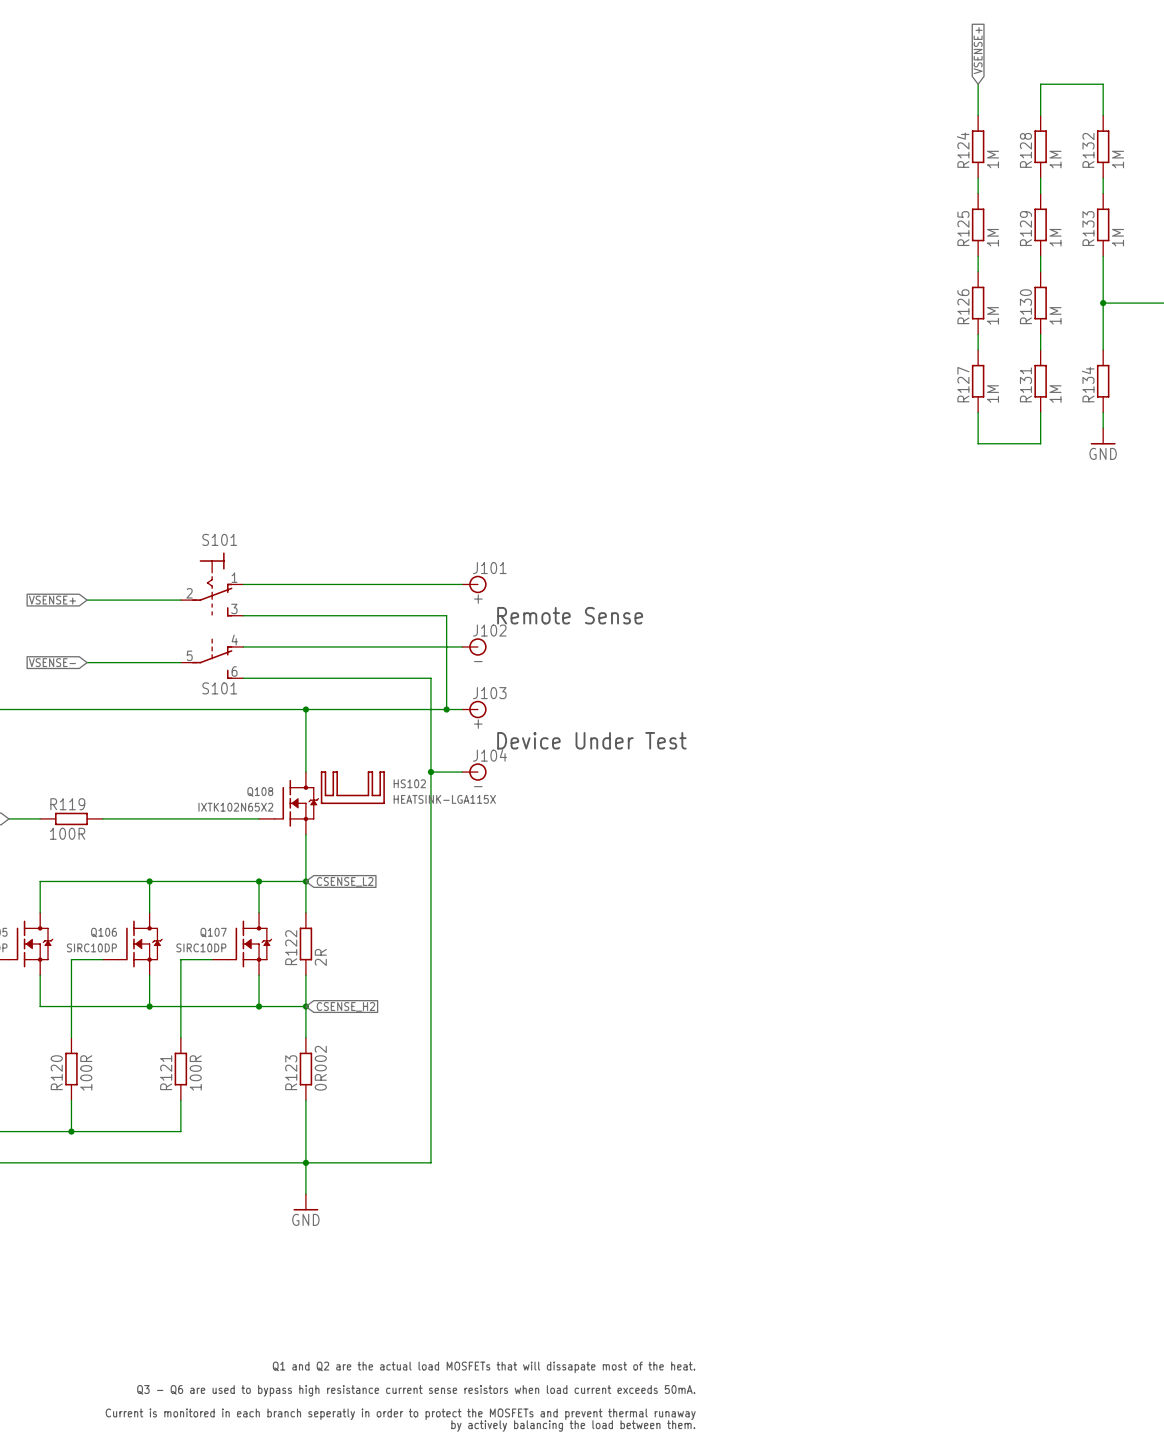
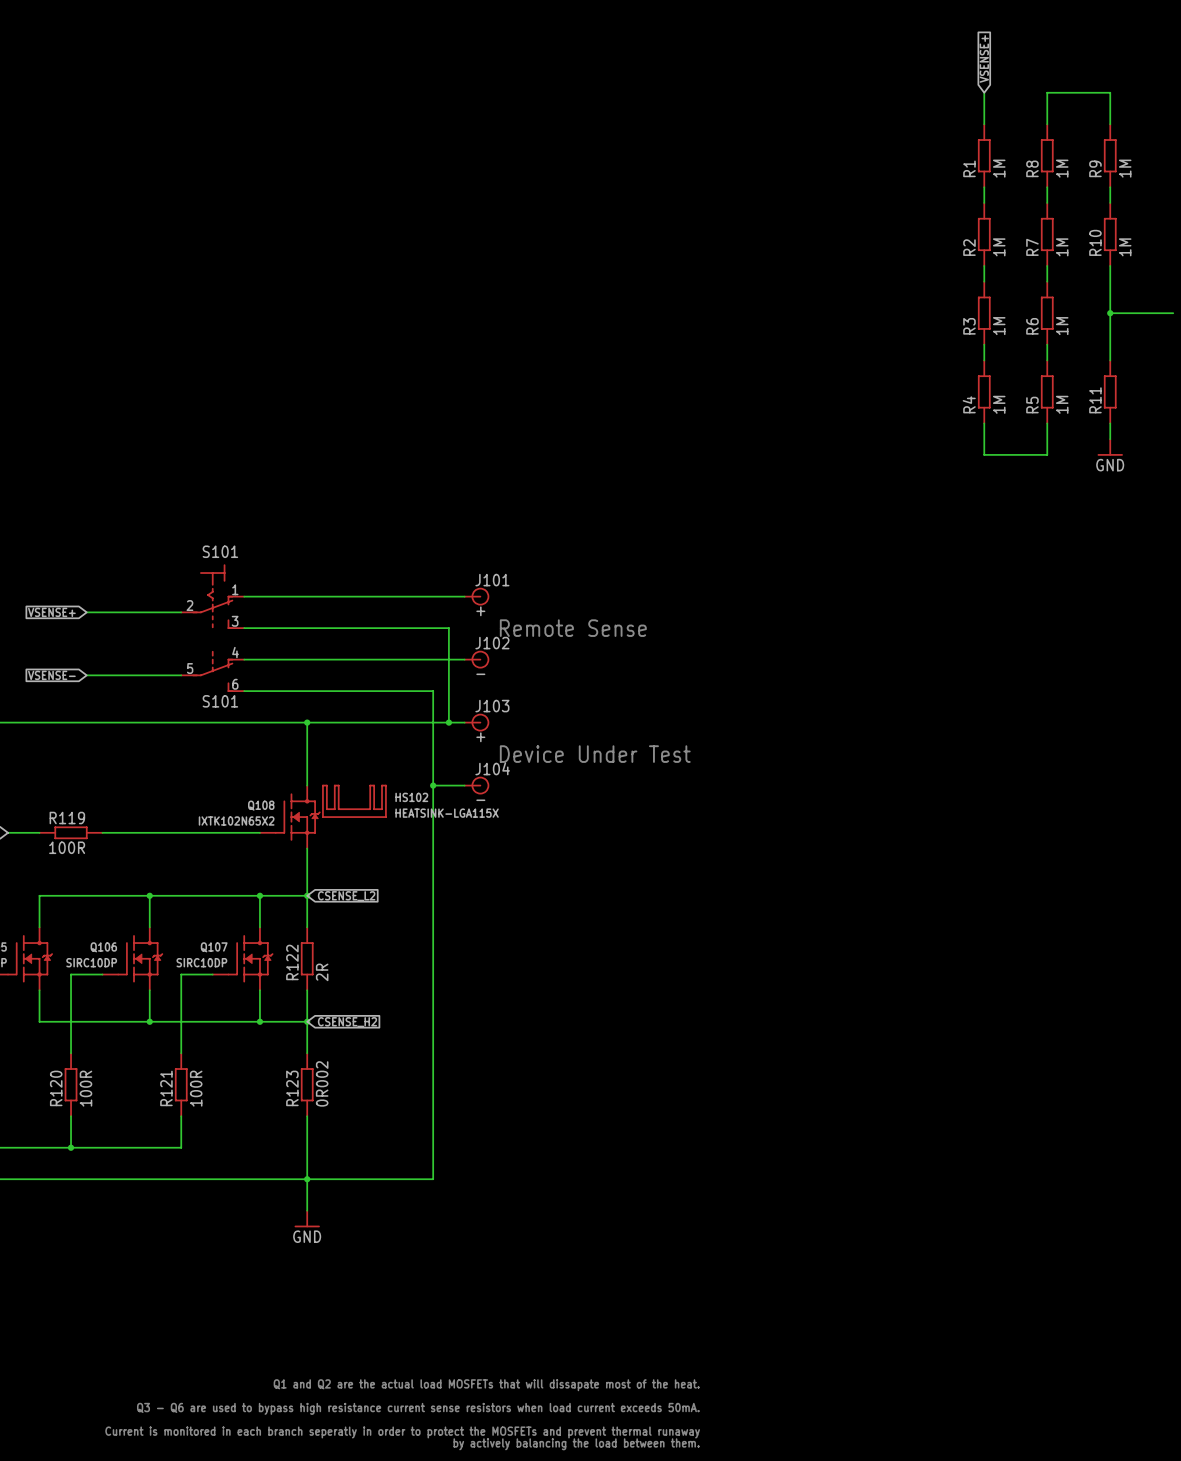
R124 name: R124 (963, 150) -> R1 (969, 168)
R128 name: R128 (1025, 150) -> R8 (1032, 168)
R132 name: R132 (1088, 150) -> R9 (1095, 168)
R125 name: R125 (963, 228) -> R2 (969, 247)
R129 name: R129 (1025, 228) -> R7 (1032, 247)
R133 name: R133 (1088, 228) -> R10 (1095, 242)
R126 name: R126 (963, 306) -> R3 (969, 326)
R130 name: R130 (1025, 306) -> R6 (1032, 326)
R127 name: R127 (963, 384) -> R4 (969, 404)
R131 name: R131 (1025, 384) -> R5 (1032, 405)
R134 name: R134 (1088, 384) -> R11 (1095, 400)

